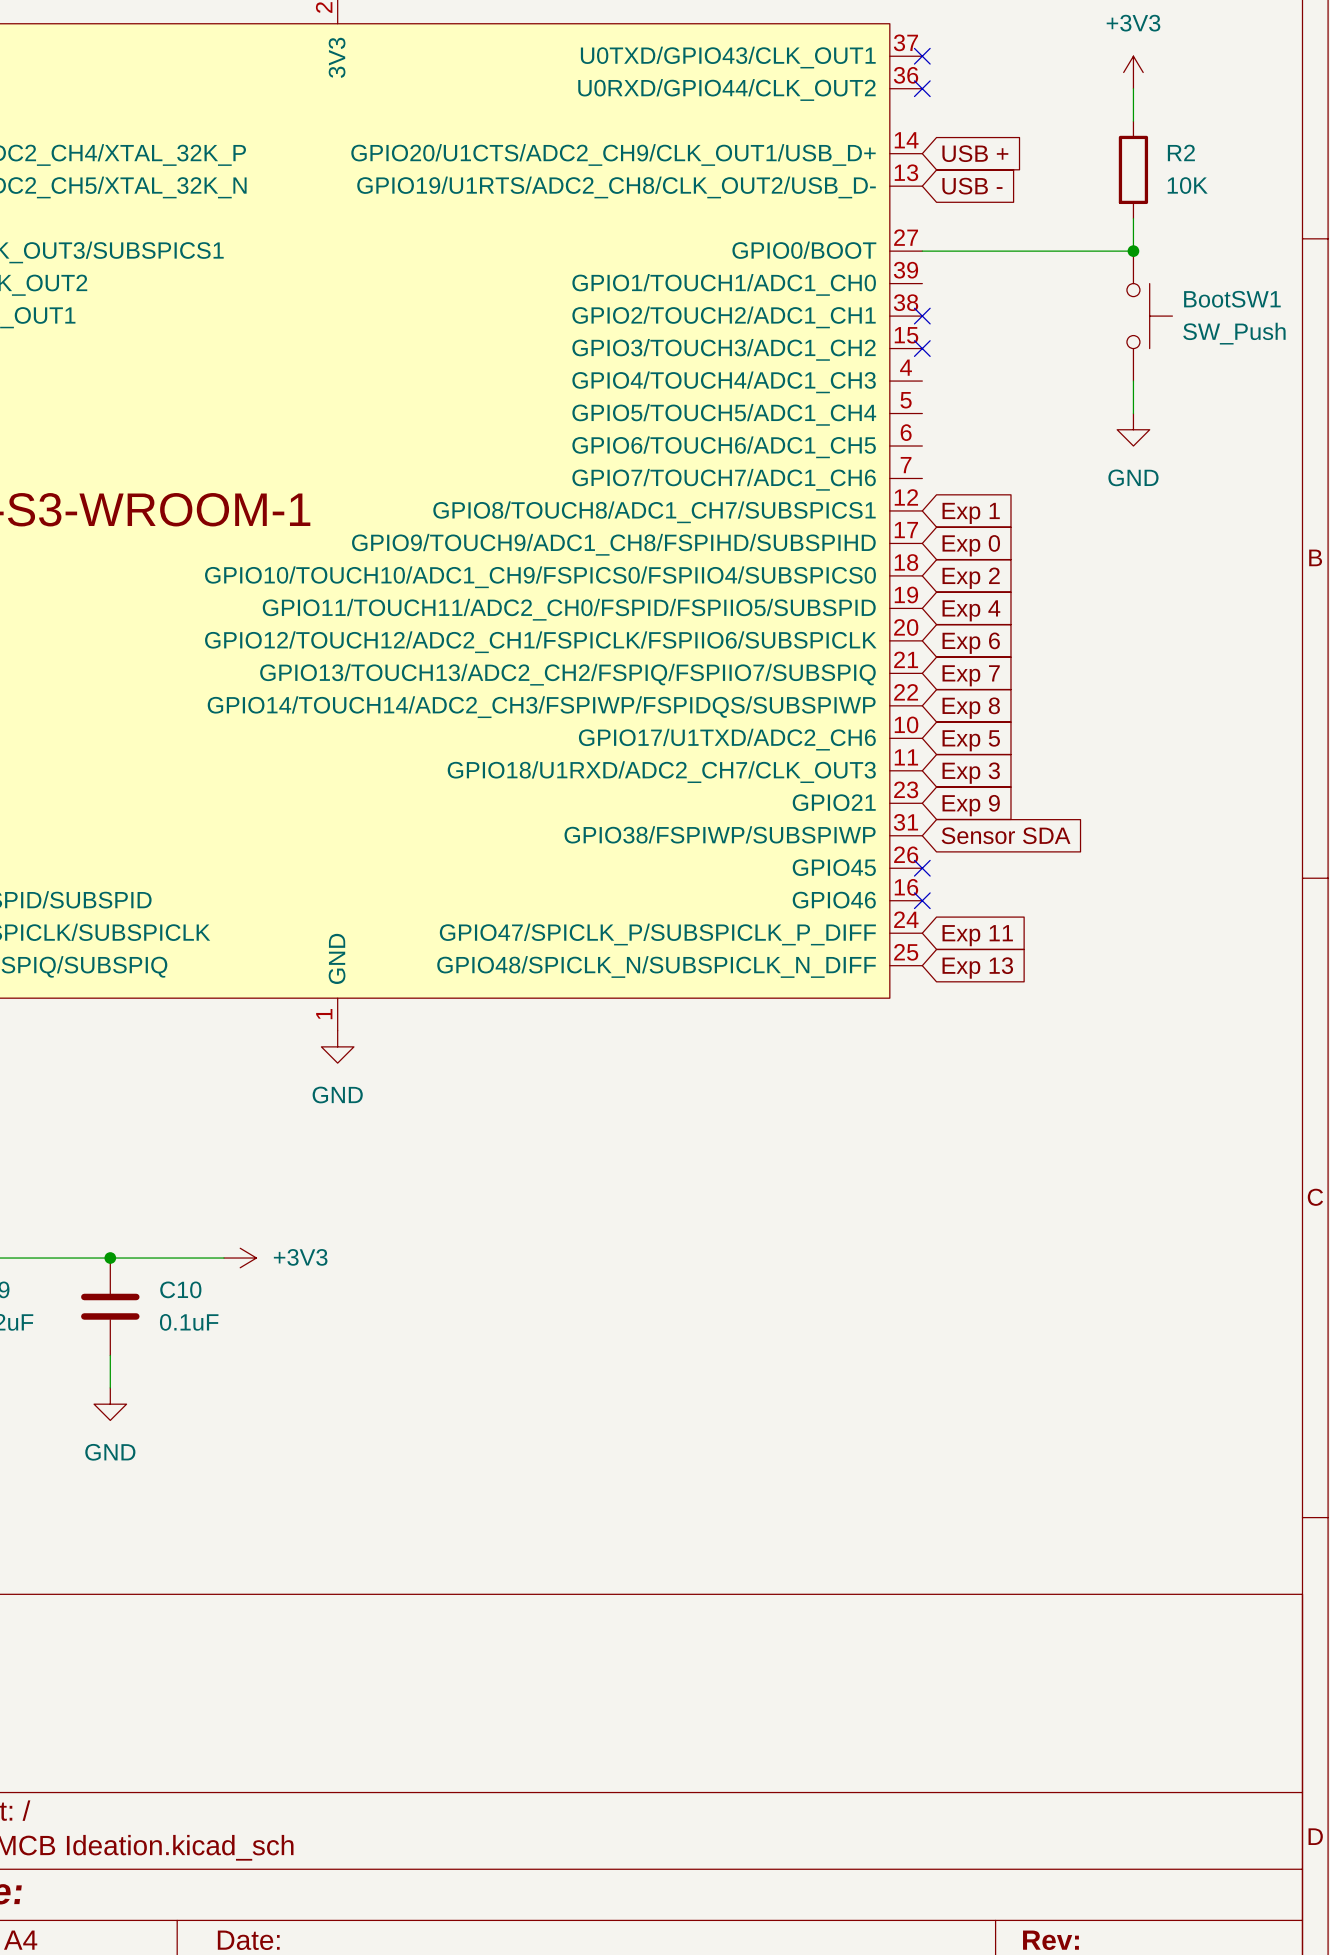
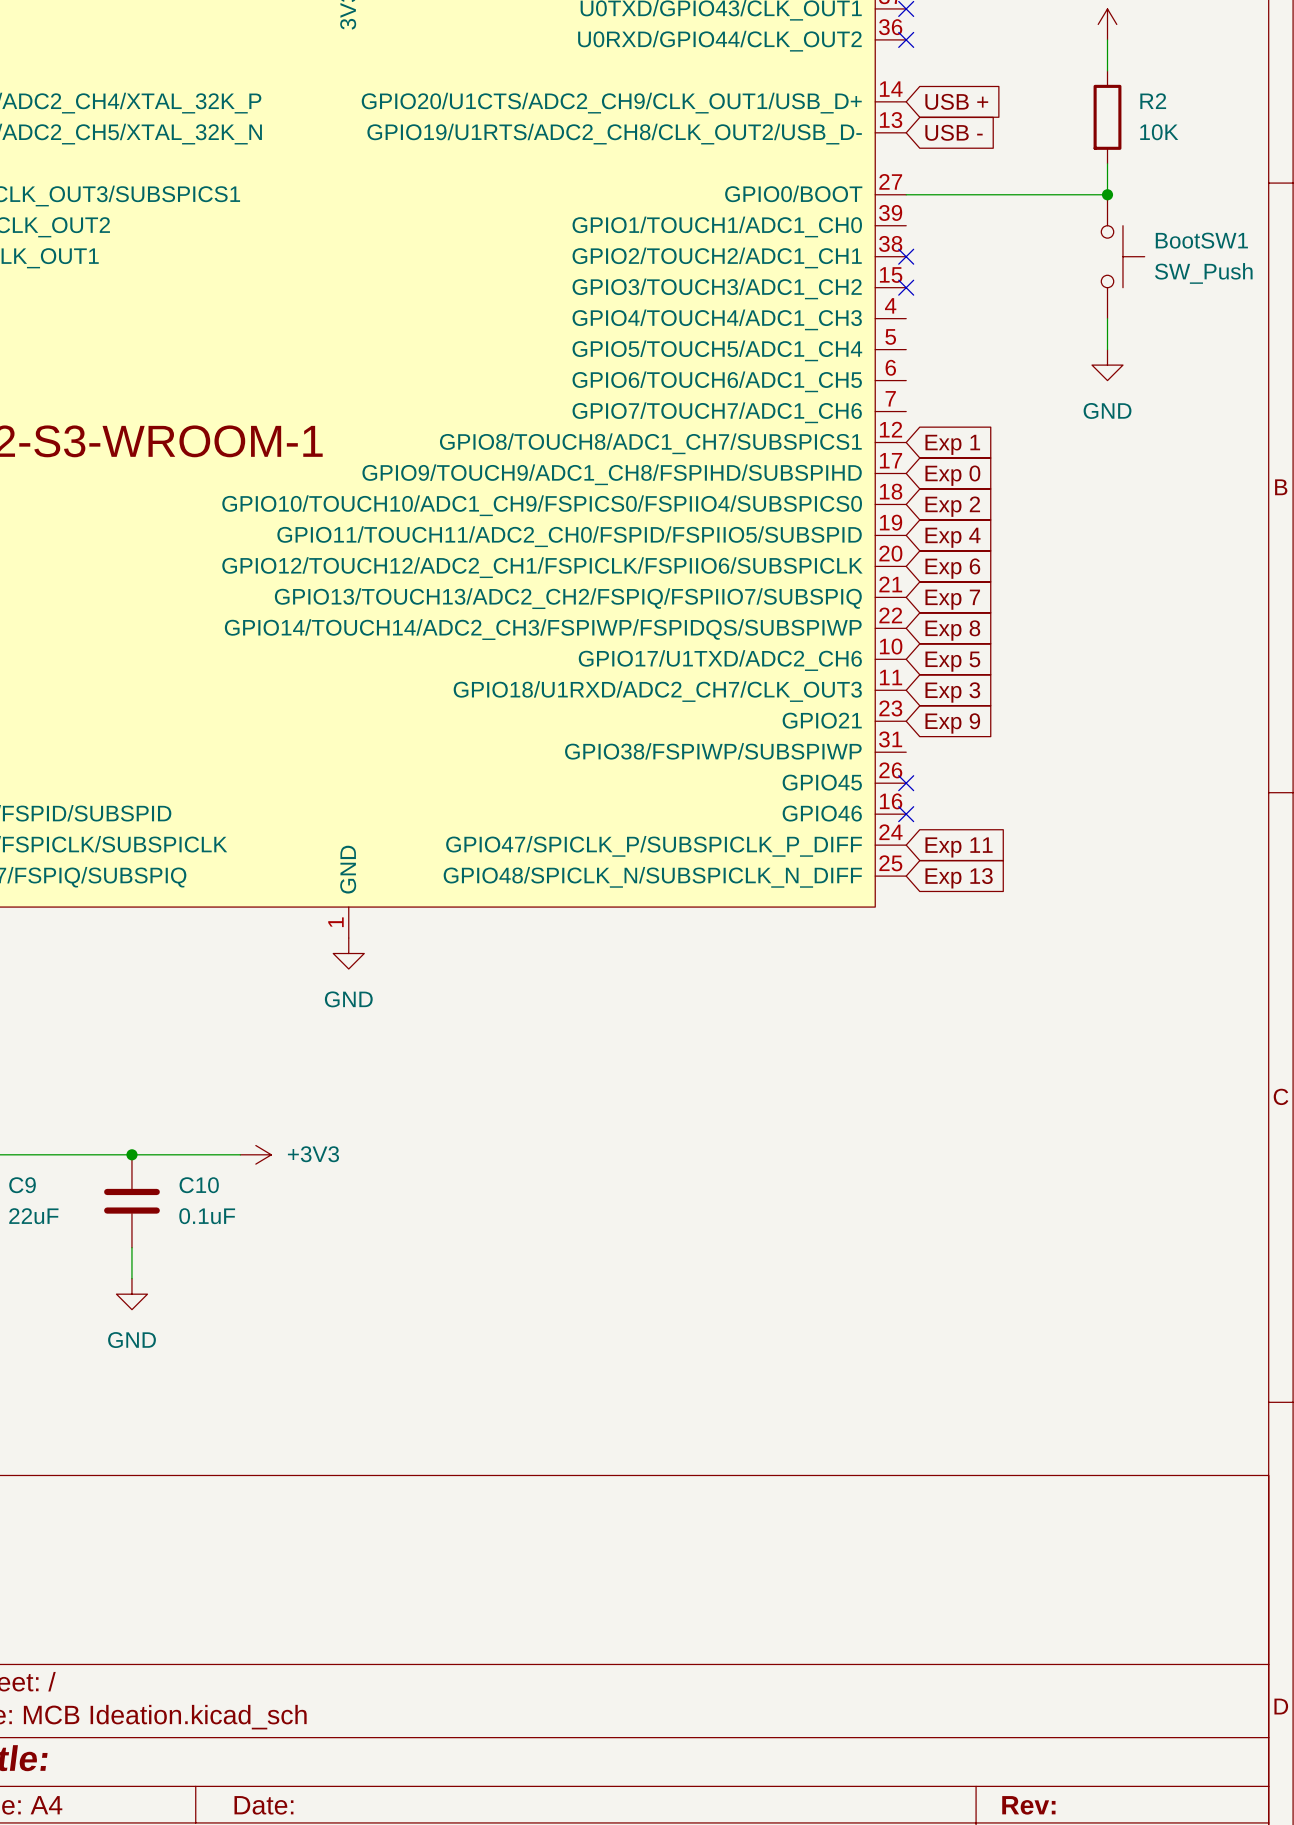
global label: Sensor SDA (1006, 835) -> none

